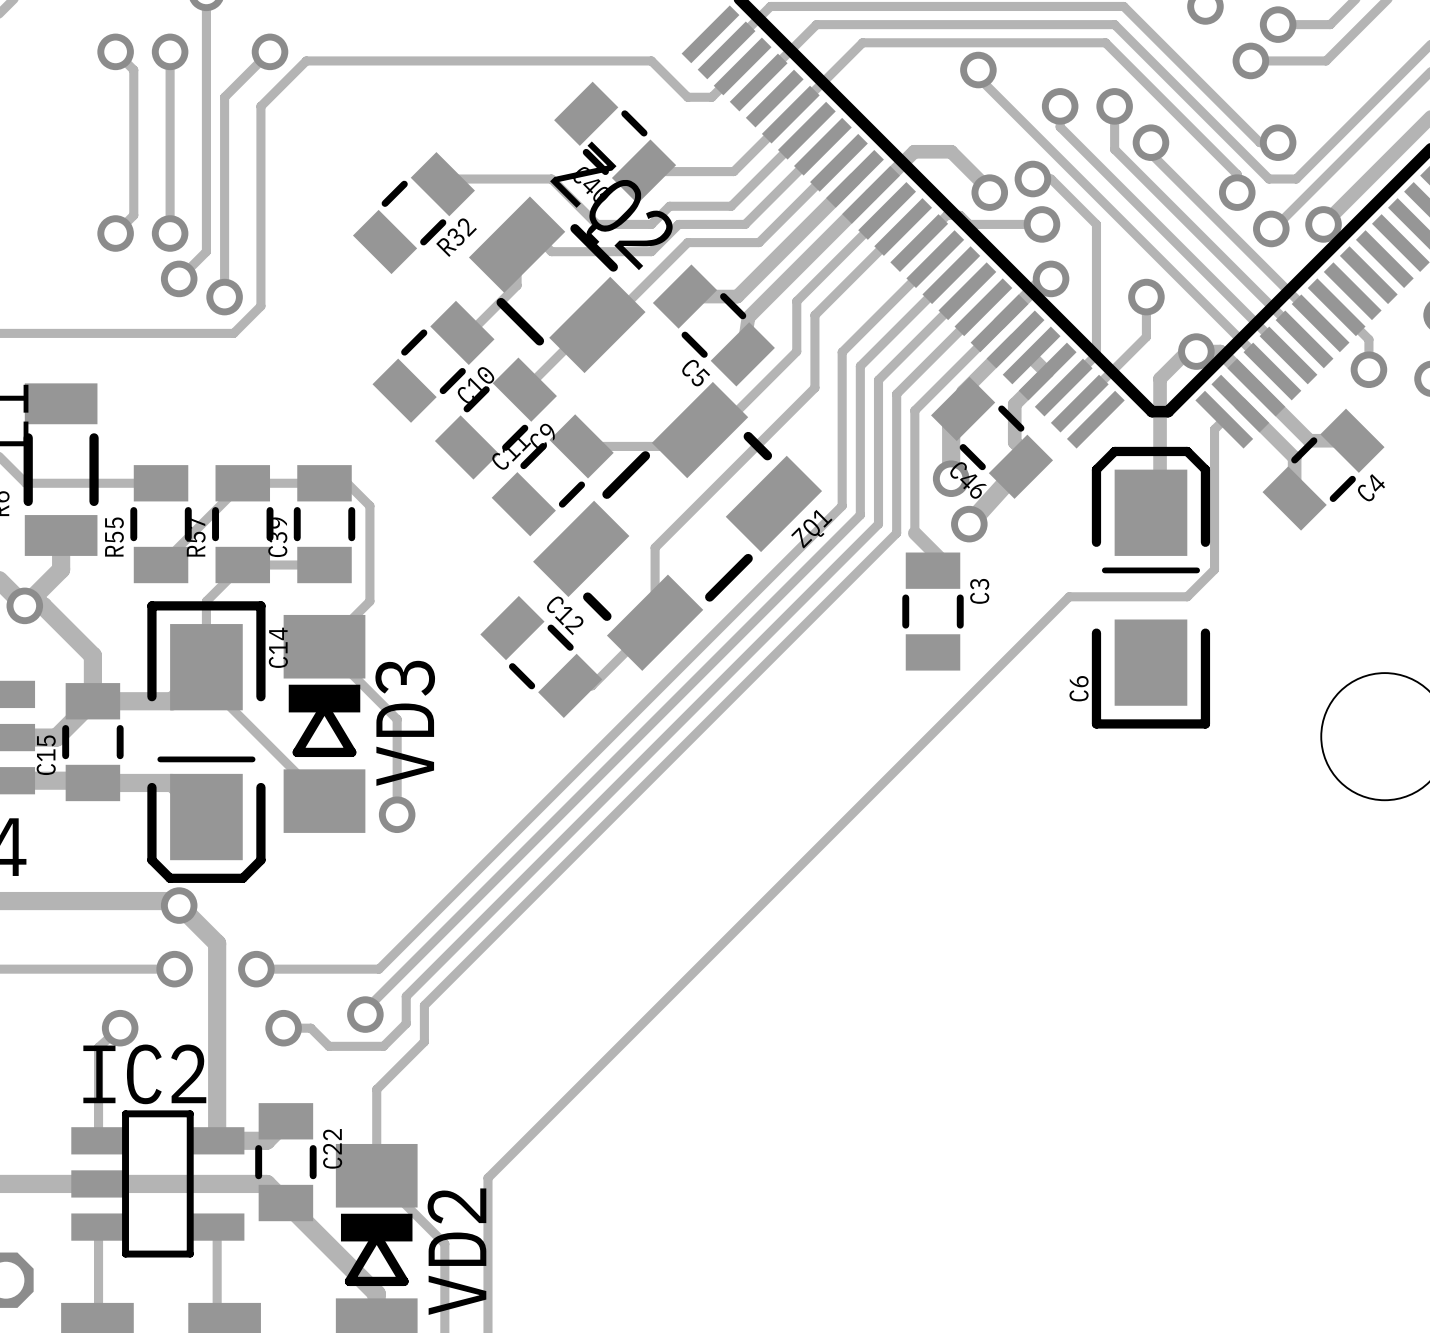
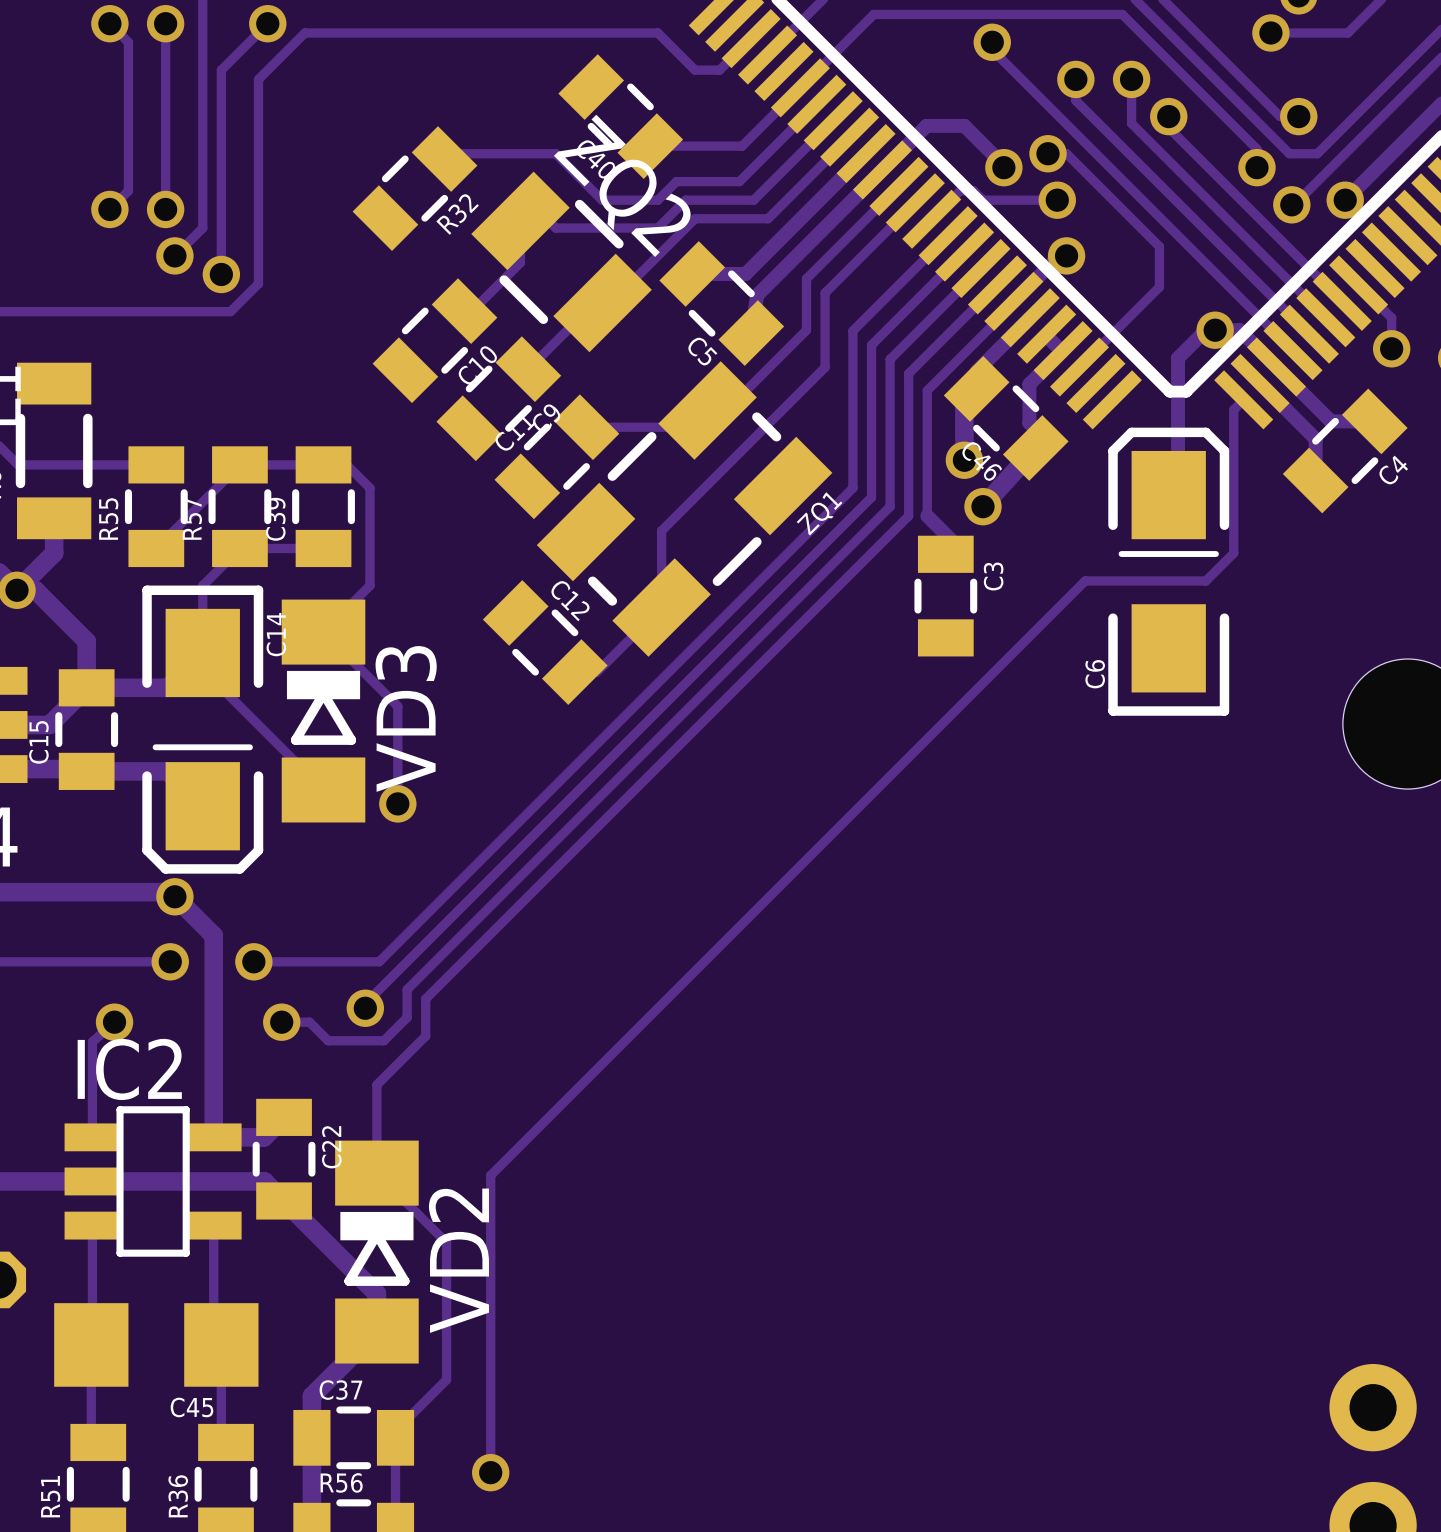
track: (1096, 224) (1096, 354) -> (1113, 200) (1159, 246) (1159, 287) (1113, 333)
track: (1146, 297) (1146, 336) (1079, 403) -> none
via: (1146, 297) -> none

